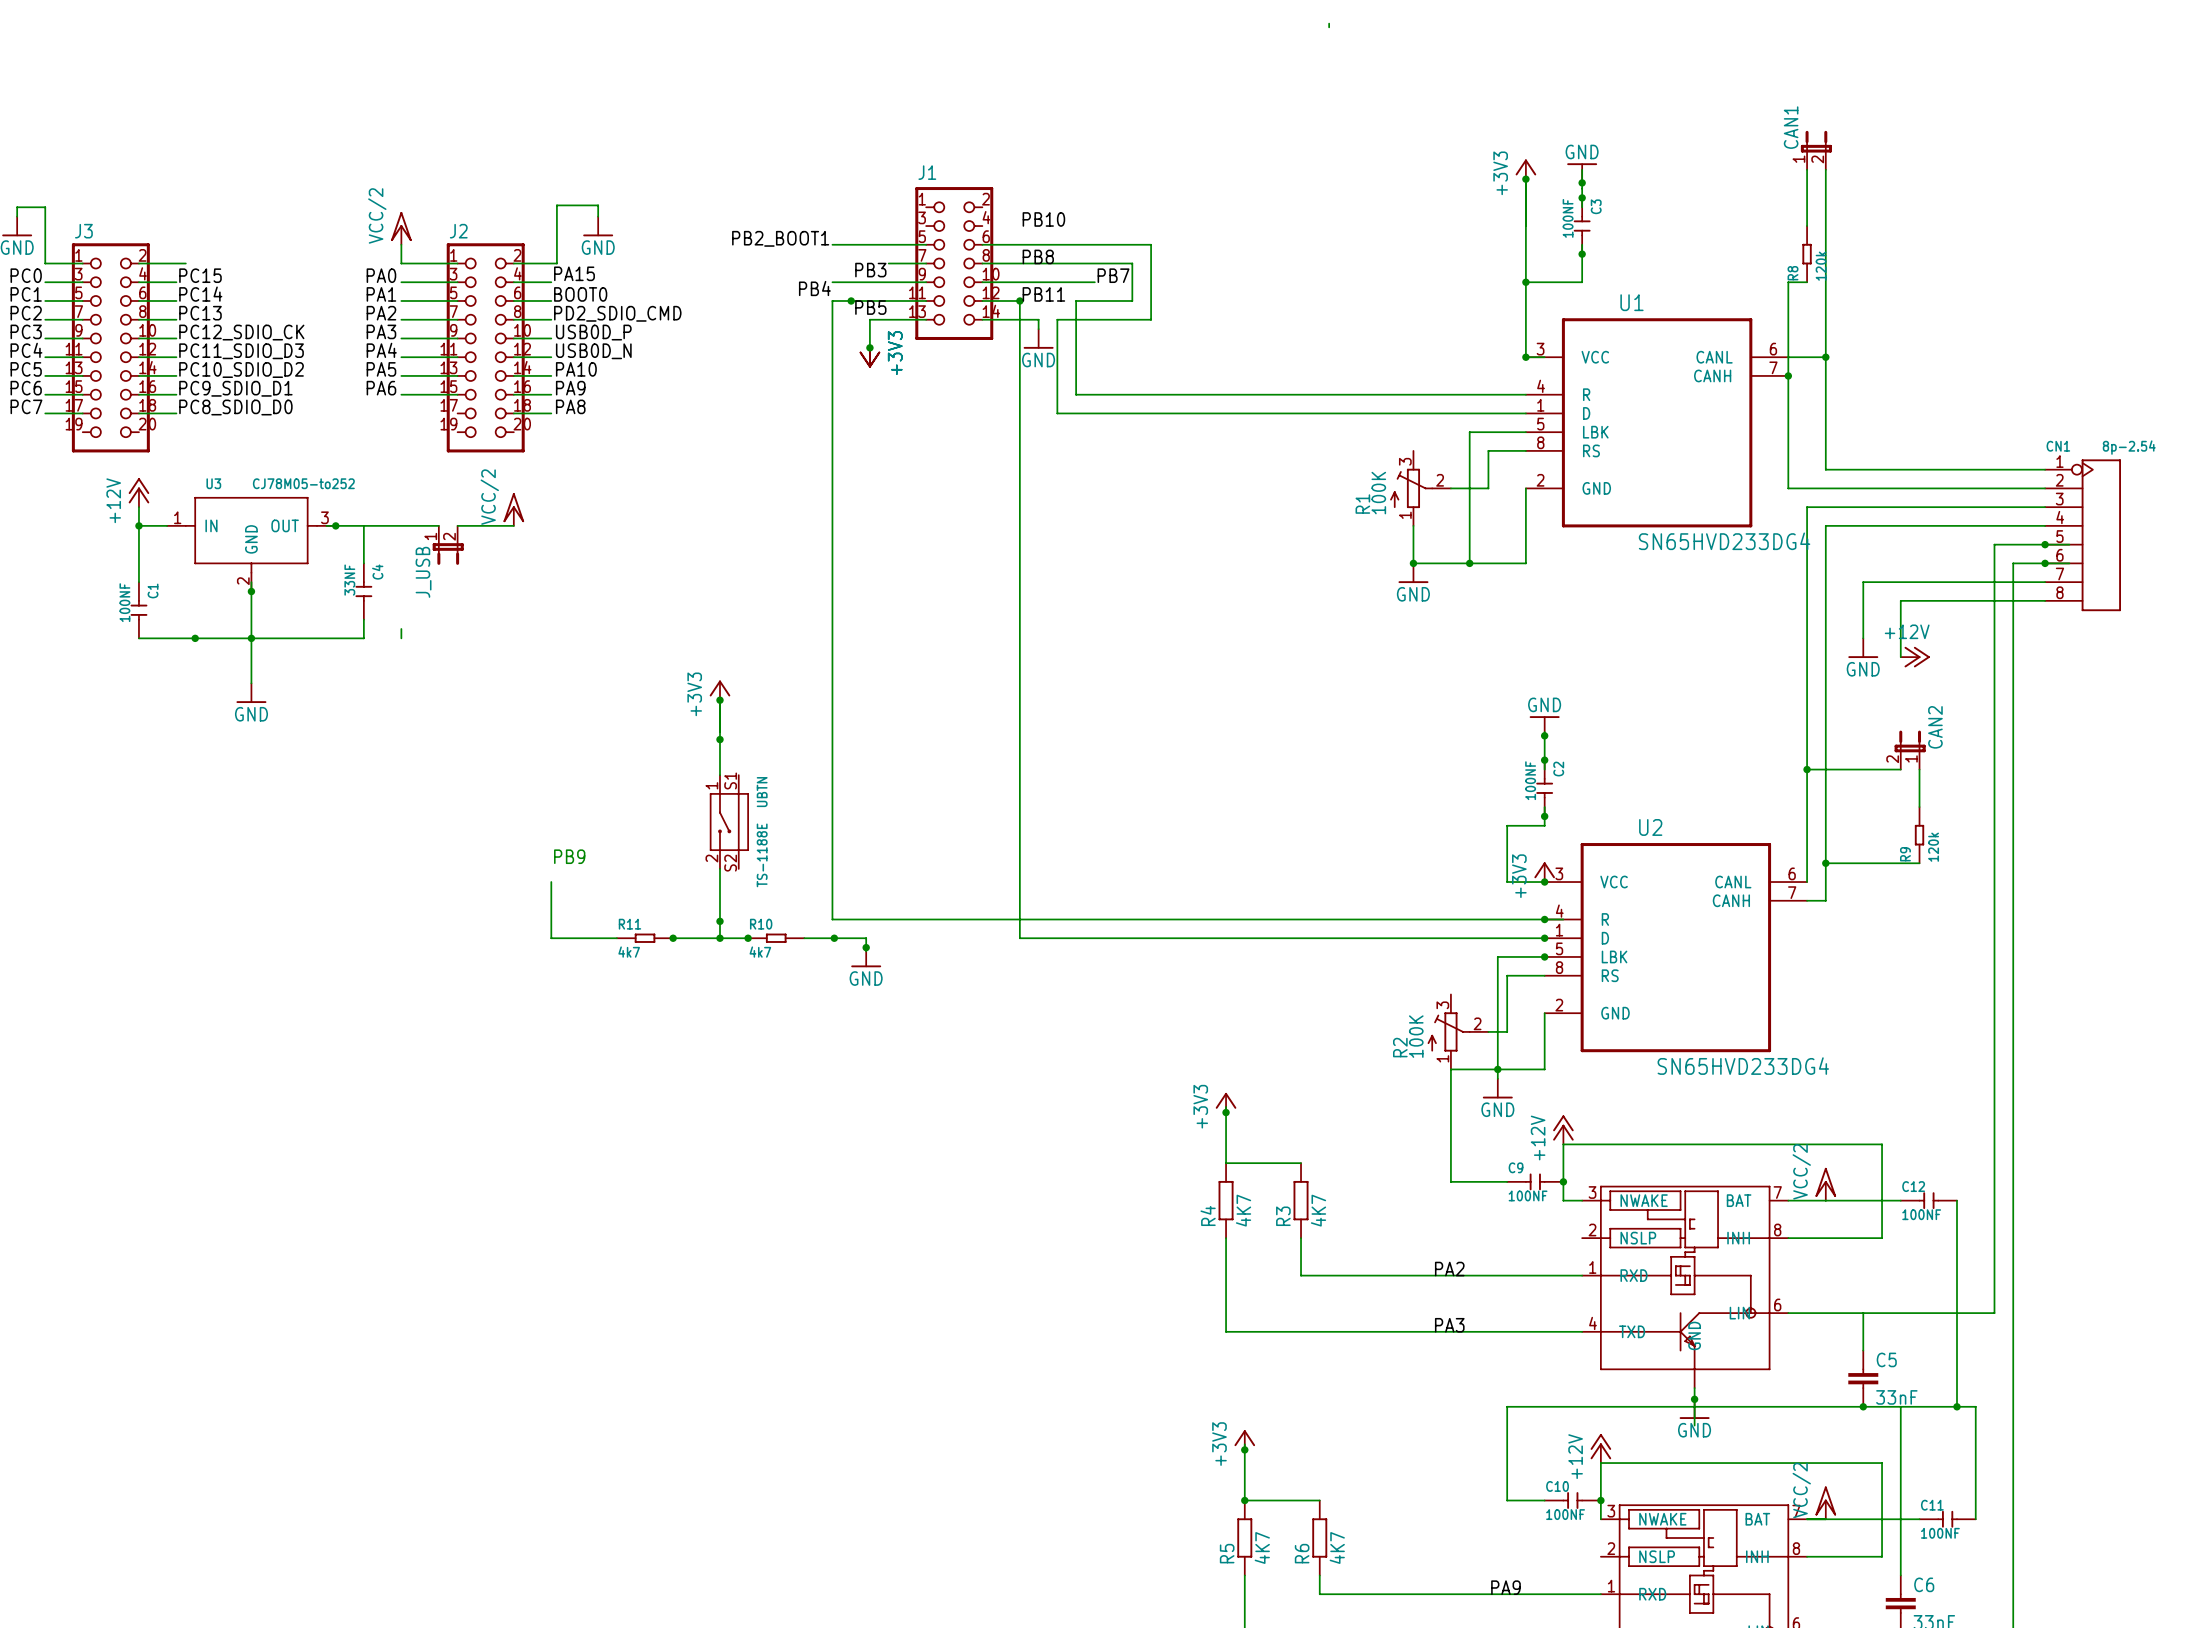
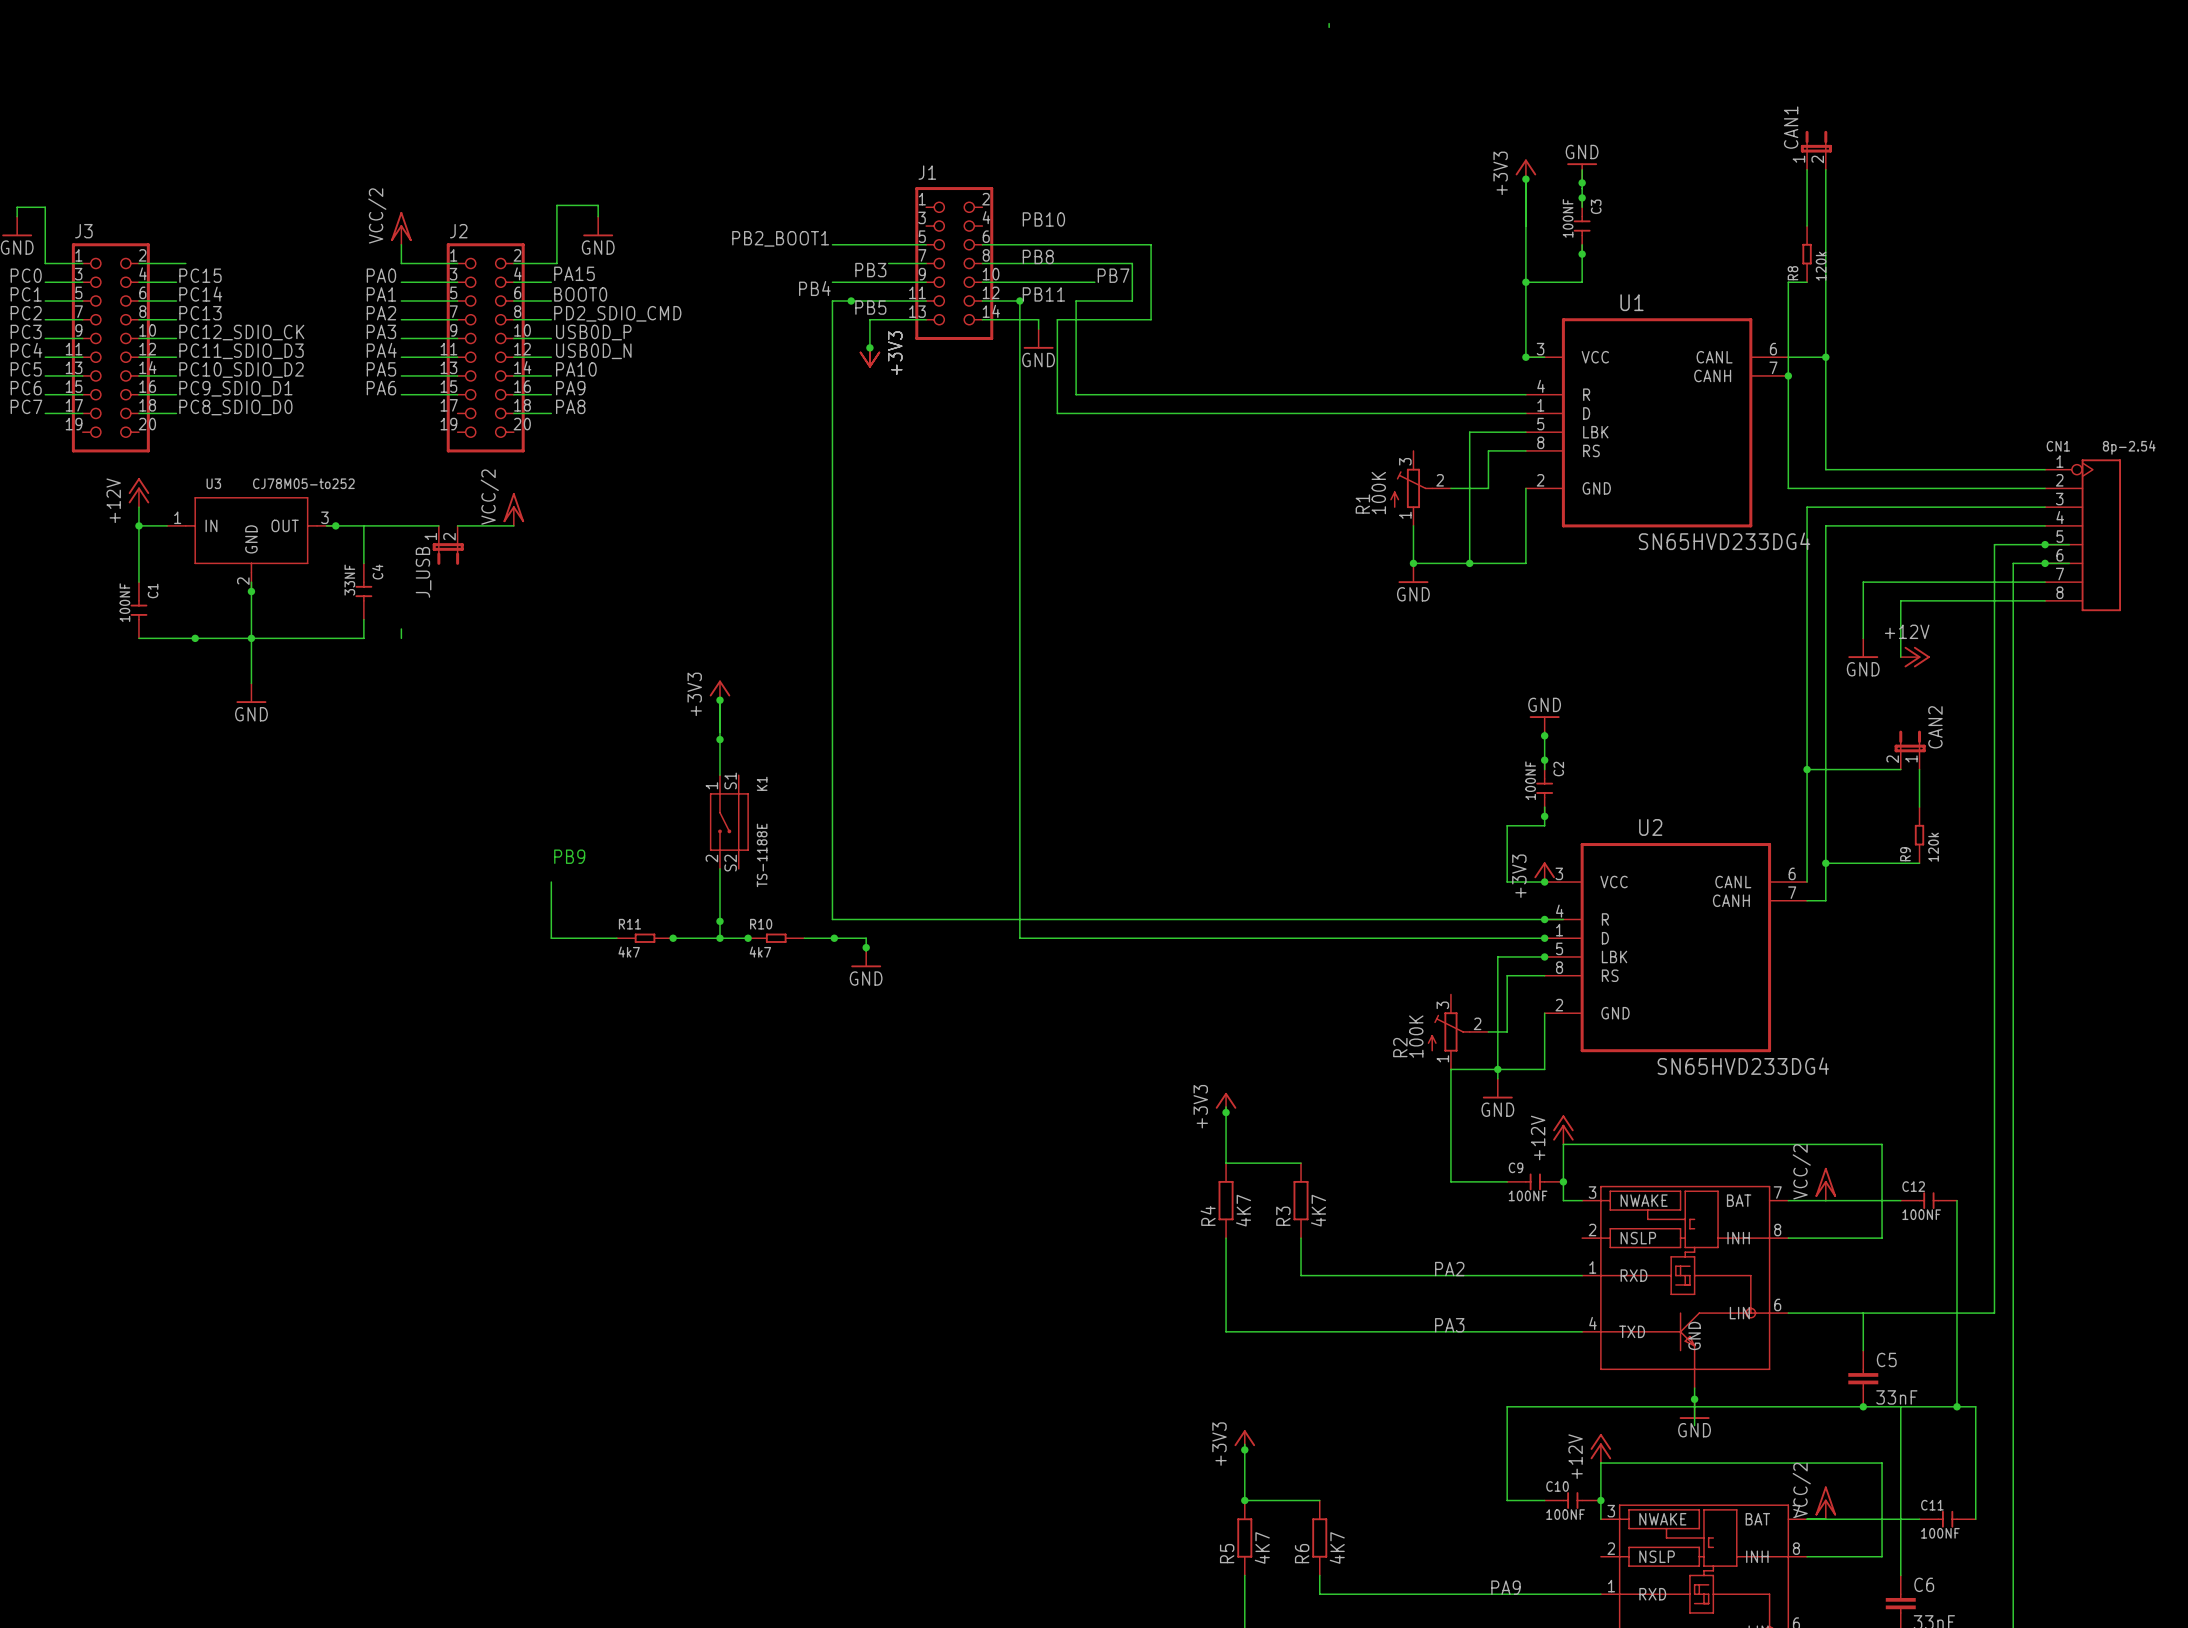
UBTN name: UBTN (762, 792) -> K1 (762, 783)

